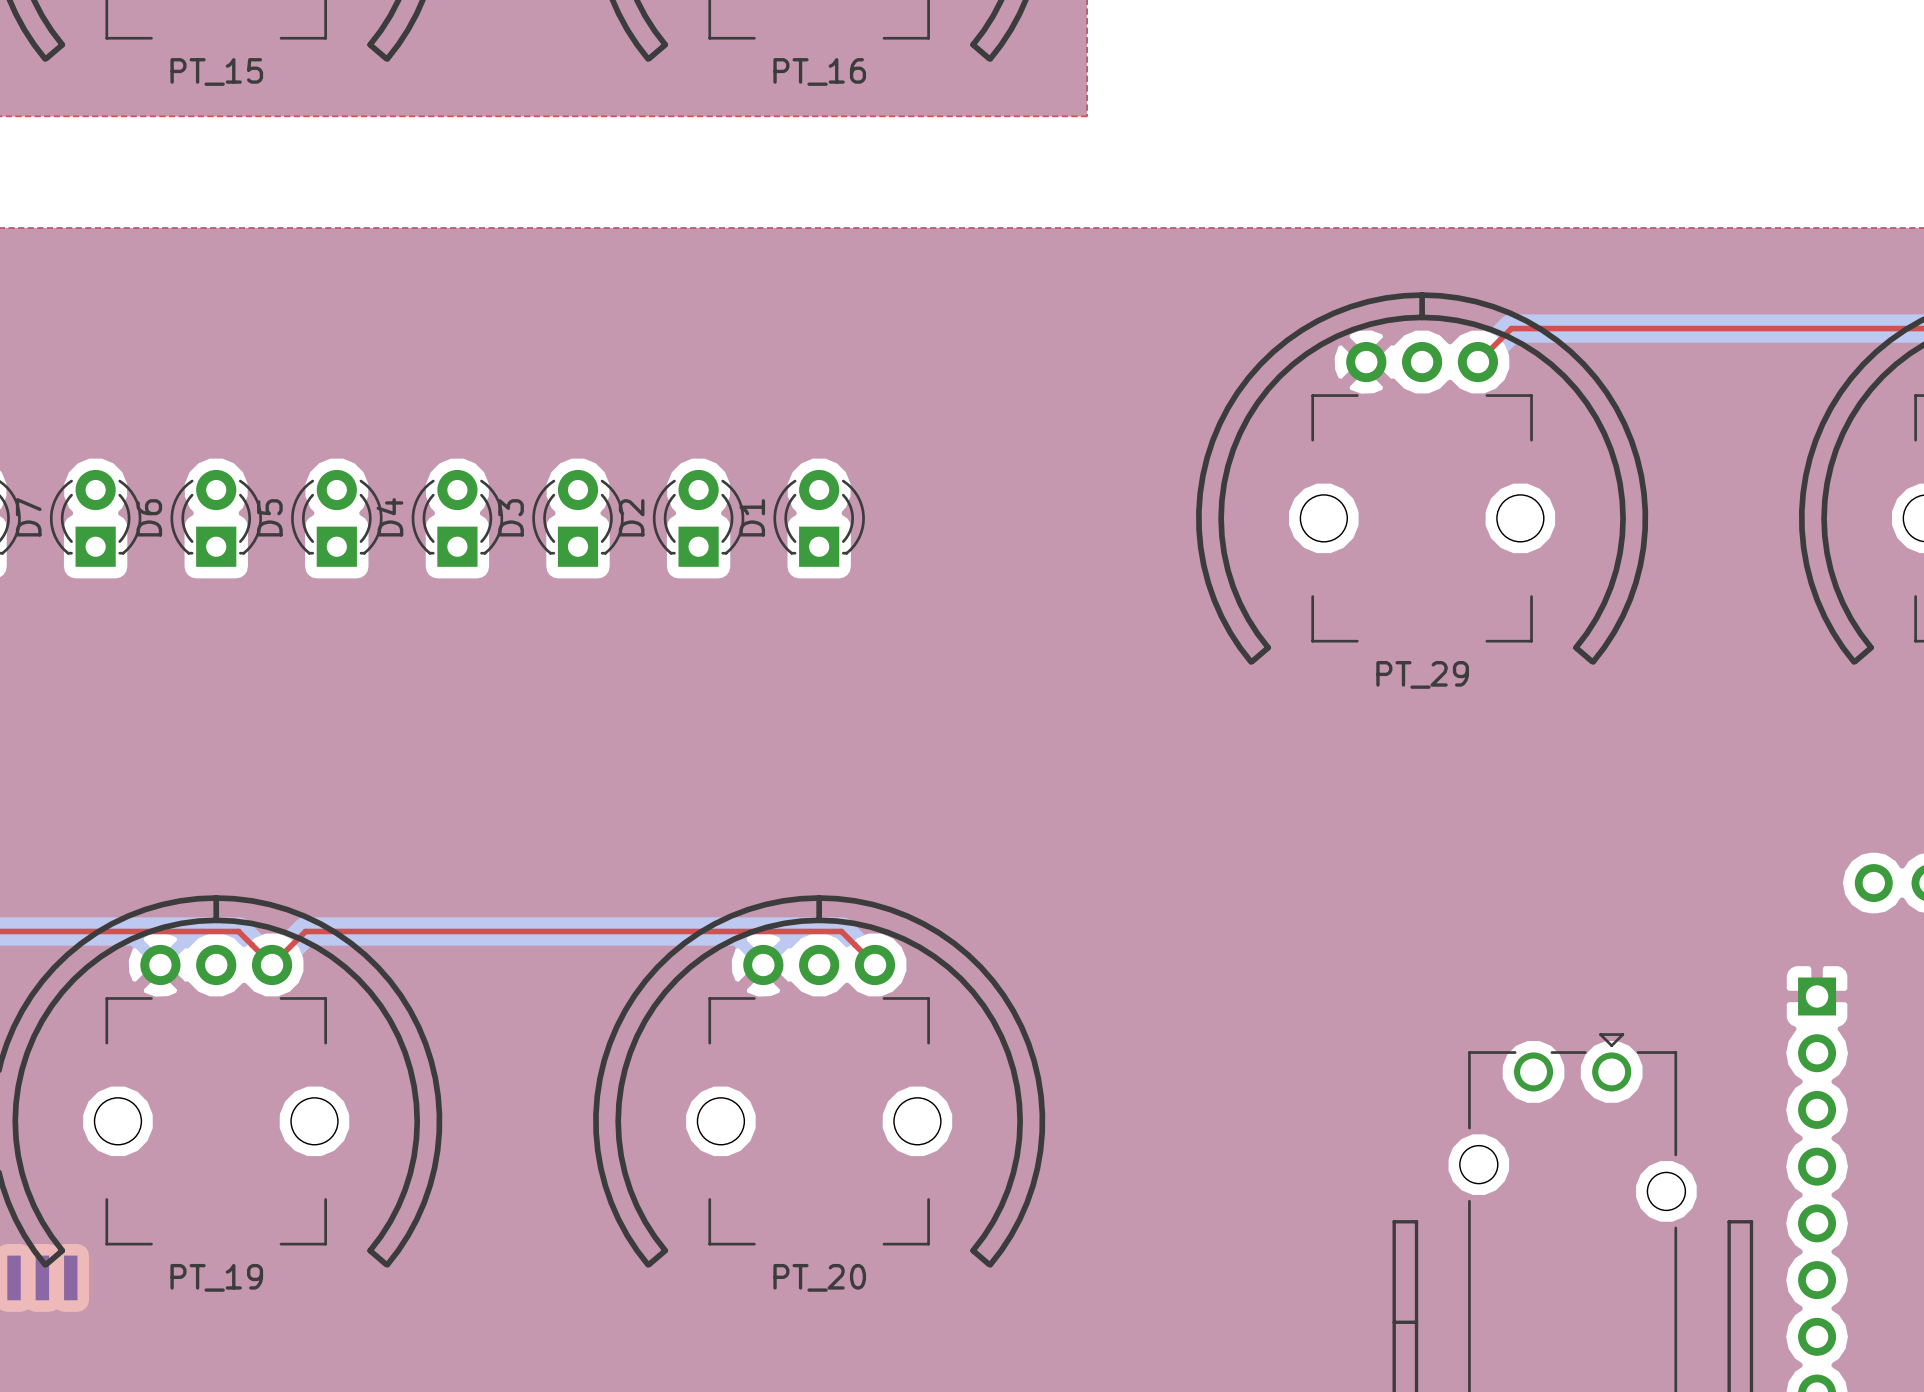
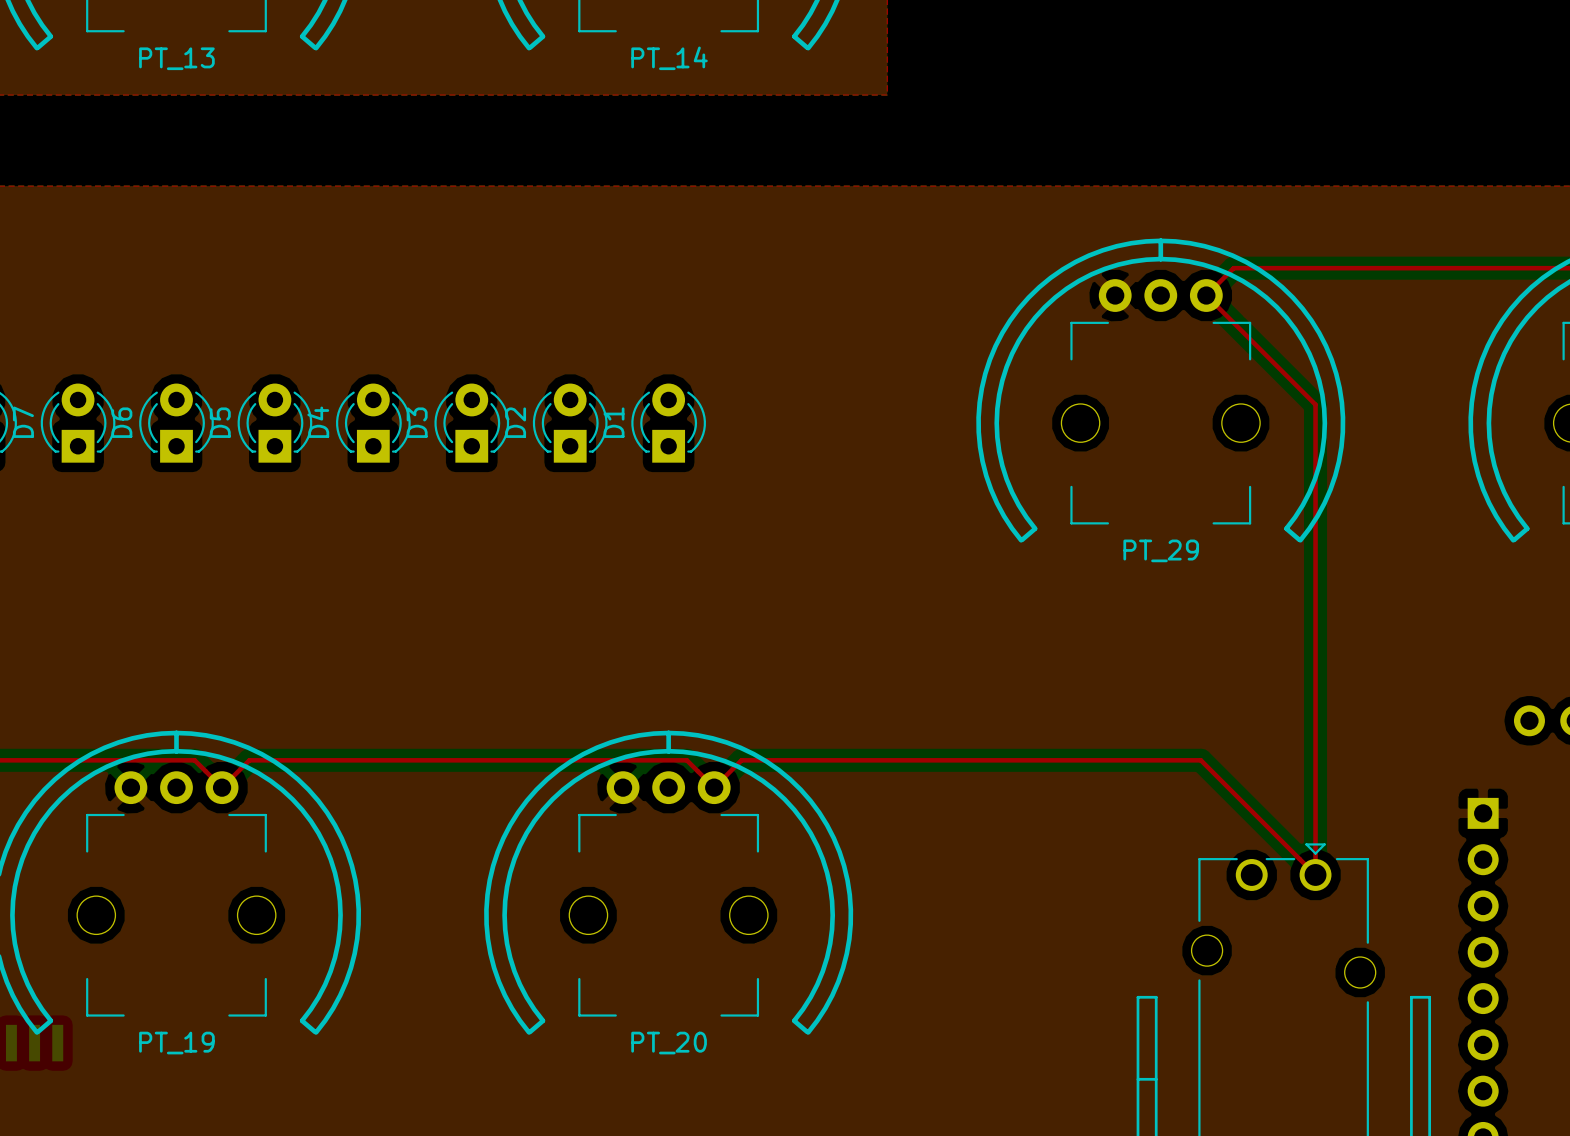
PT_15 name: PT_15 (216, 71) -> PT_13 (176, 58)
PT_16 name: PT_16 (819, 71) -> PT_14 (669, 58)
top track: none -> (1206, 295) (1315, 404) (1315, 874) (1200, 760) (741, 760) (714, 787)

